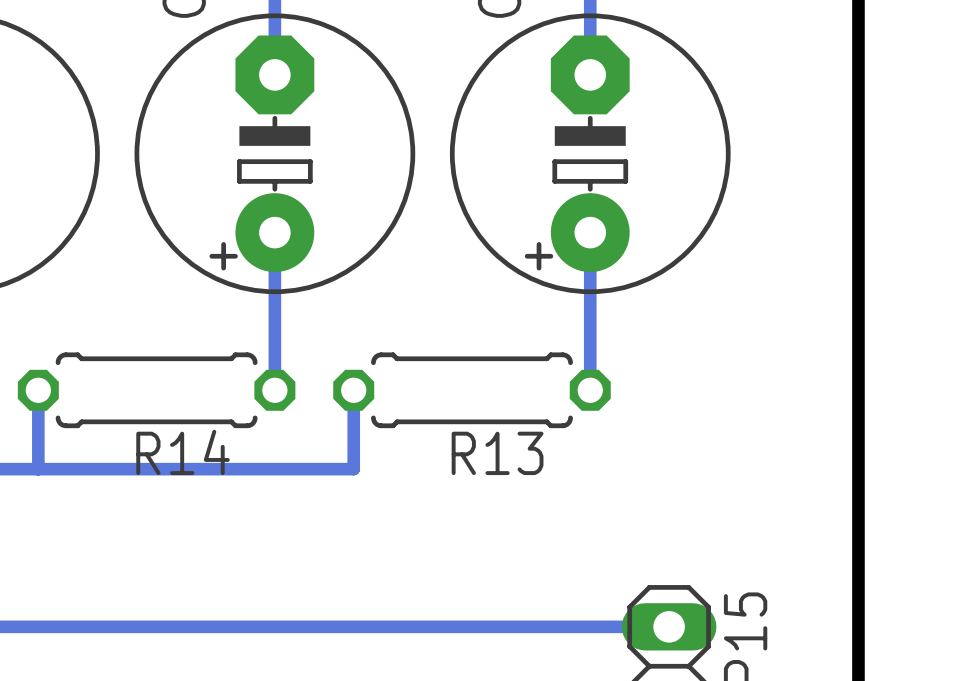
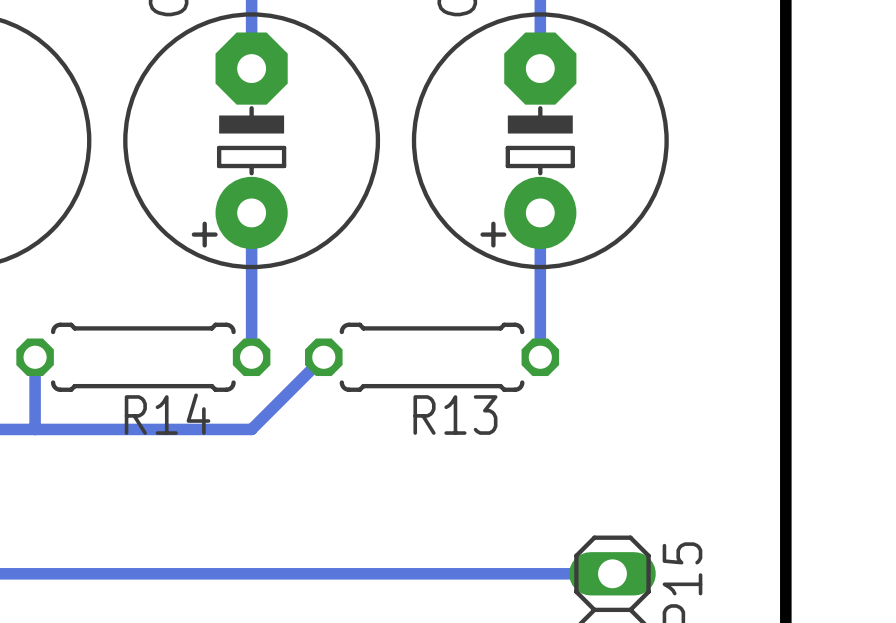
bottom track: (353, 390) (353, 469) (274, 469) -> (323, 357) (251, 429)

